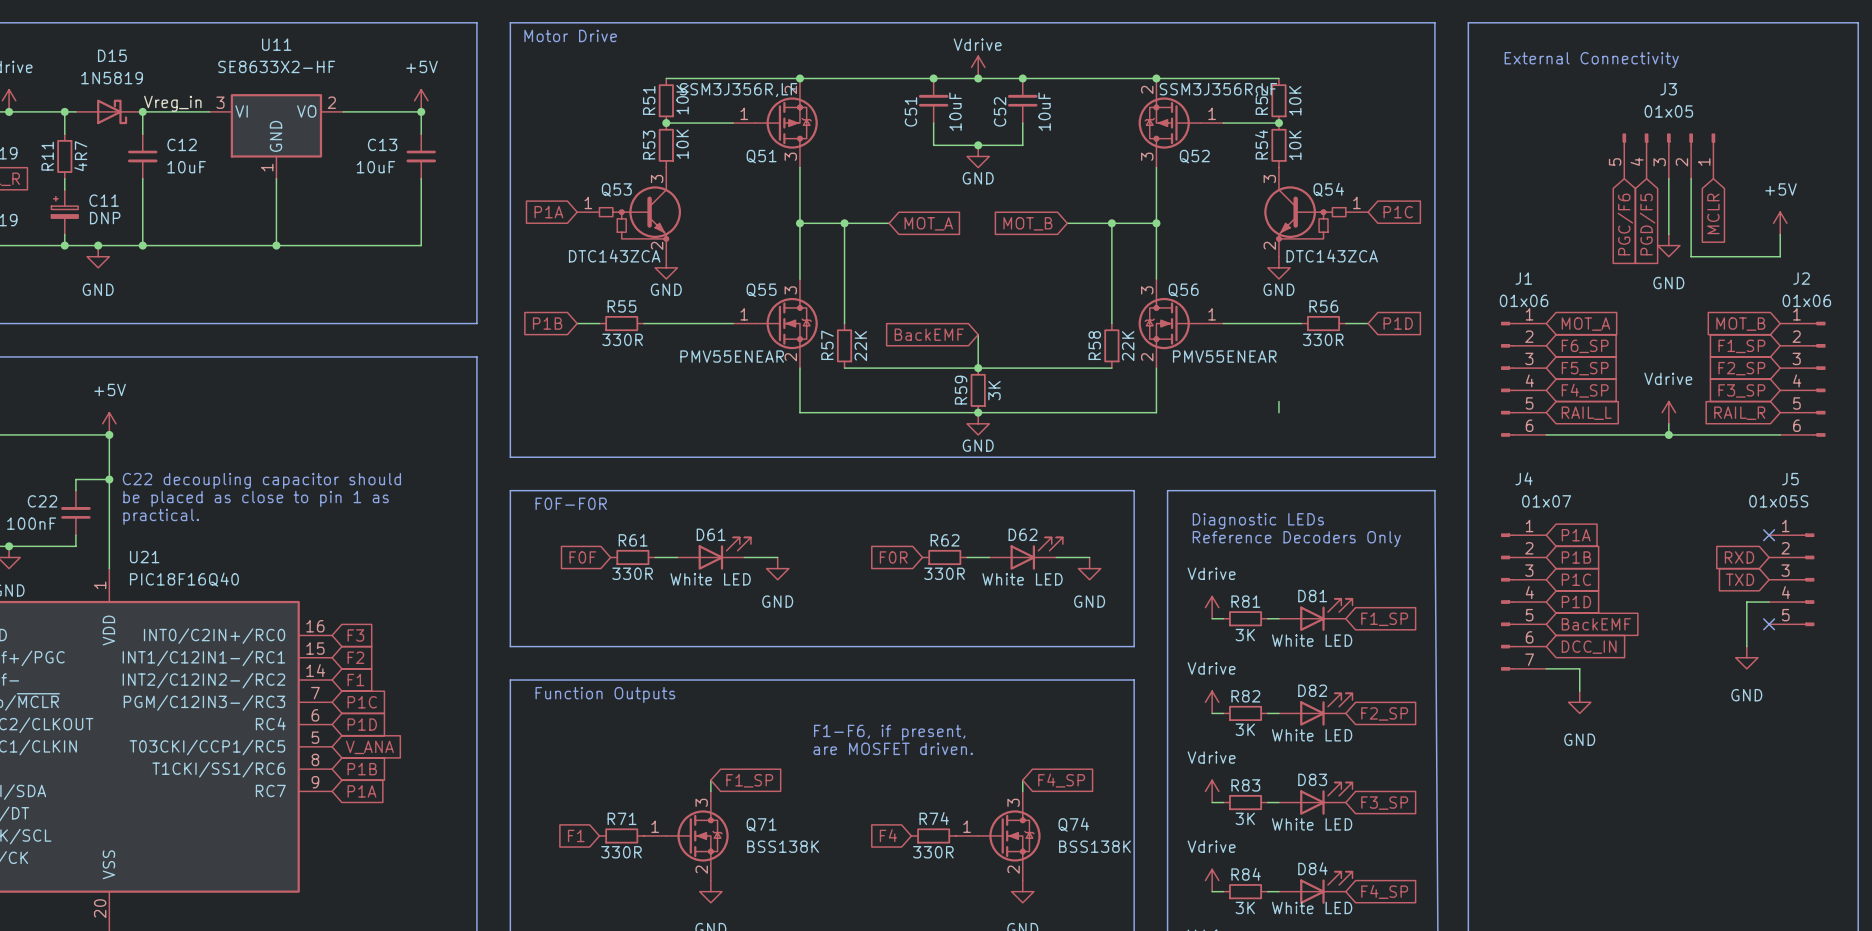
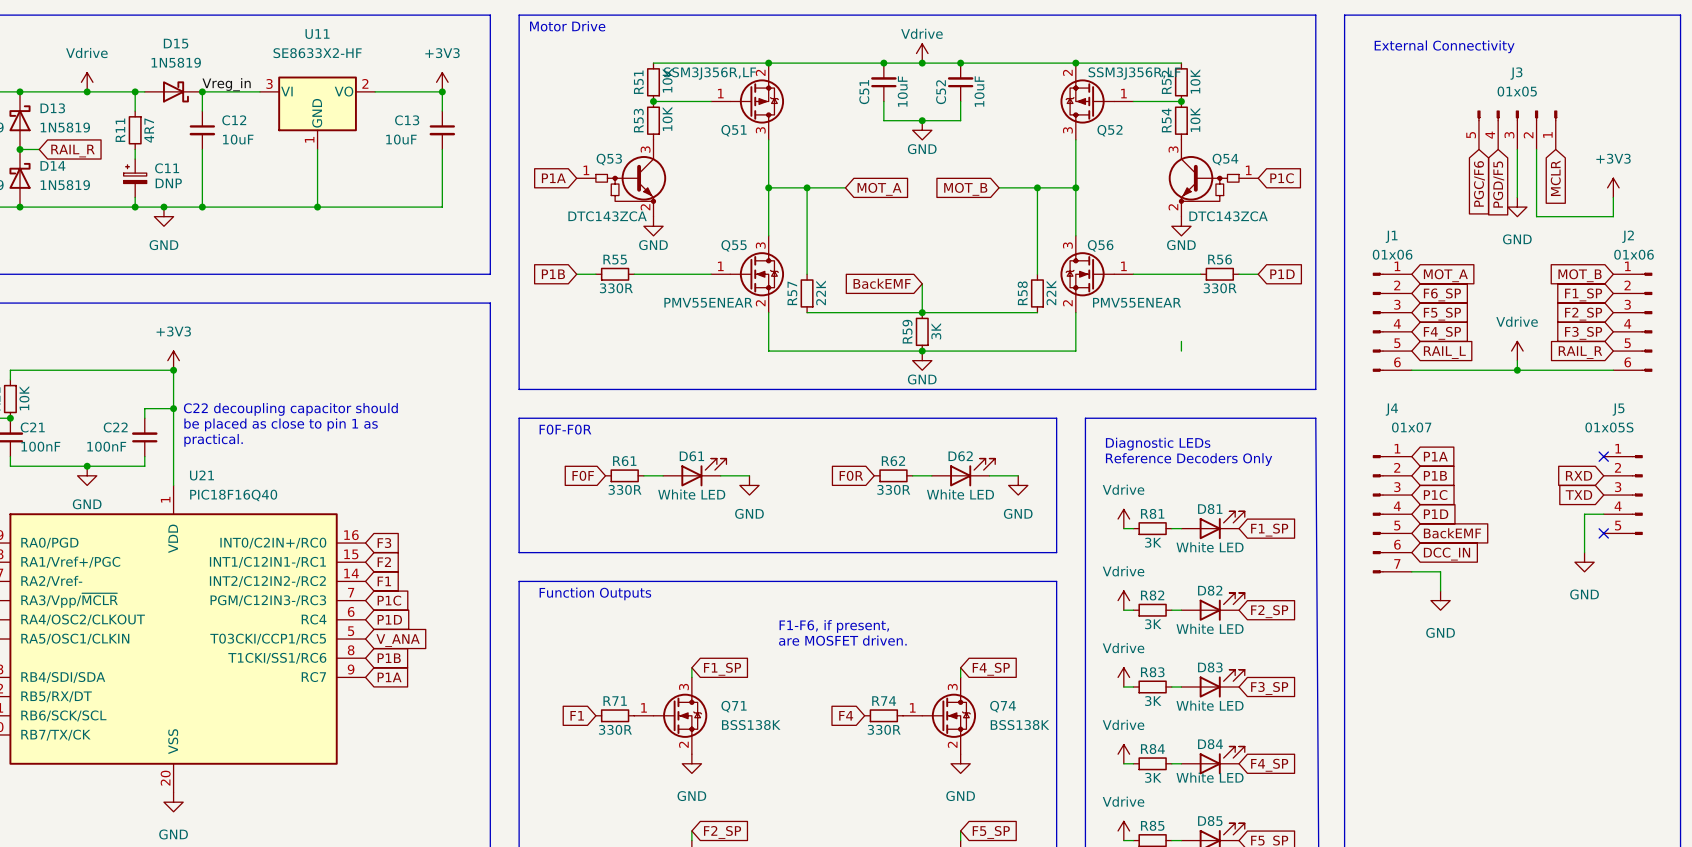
power symbol: +5V (421, 100) -> +3V3 (442, 82)
power symbol: +5V (1780, 223) -> +3V3 (1613, 187)
power symbol: +5V (109, 423) -> +3V3 (173, 360)

